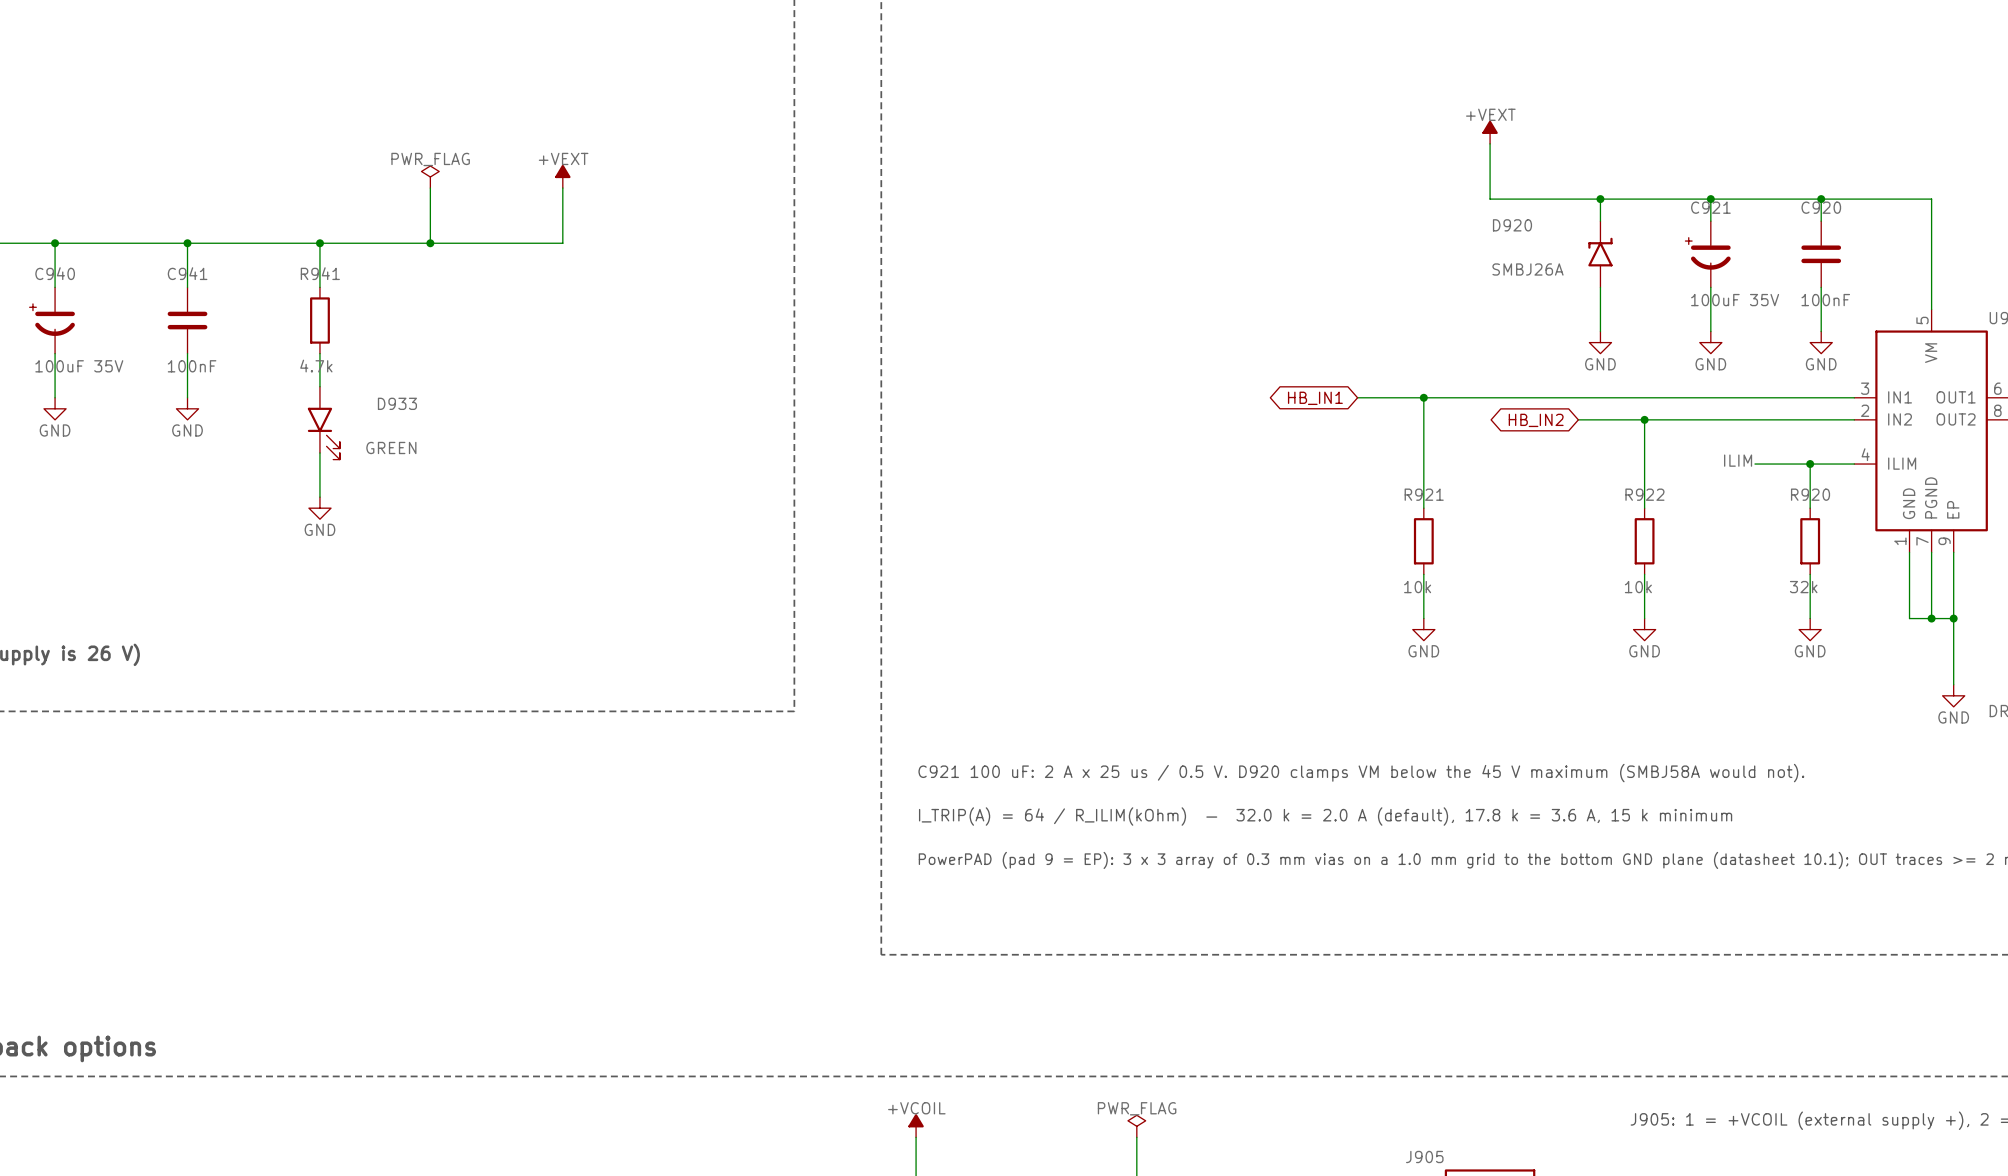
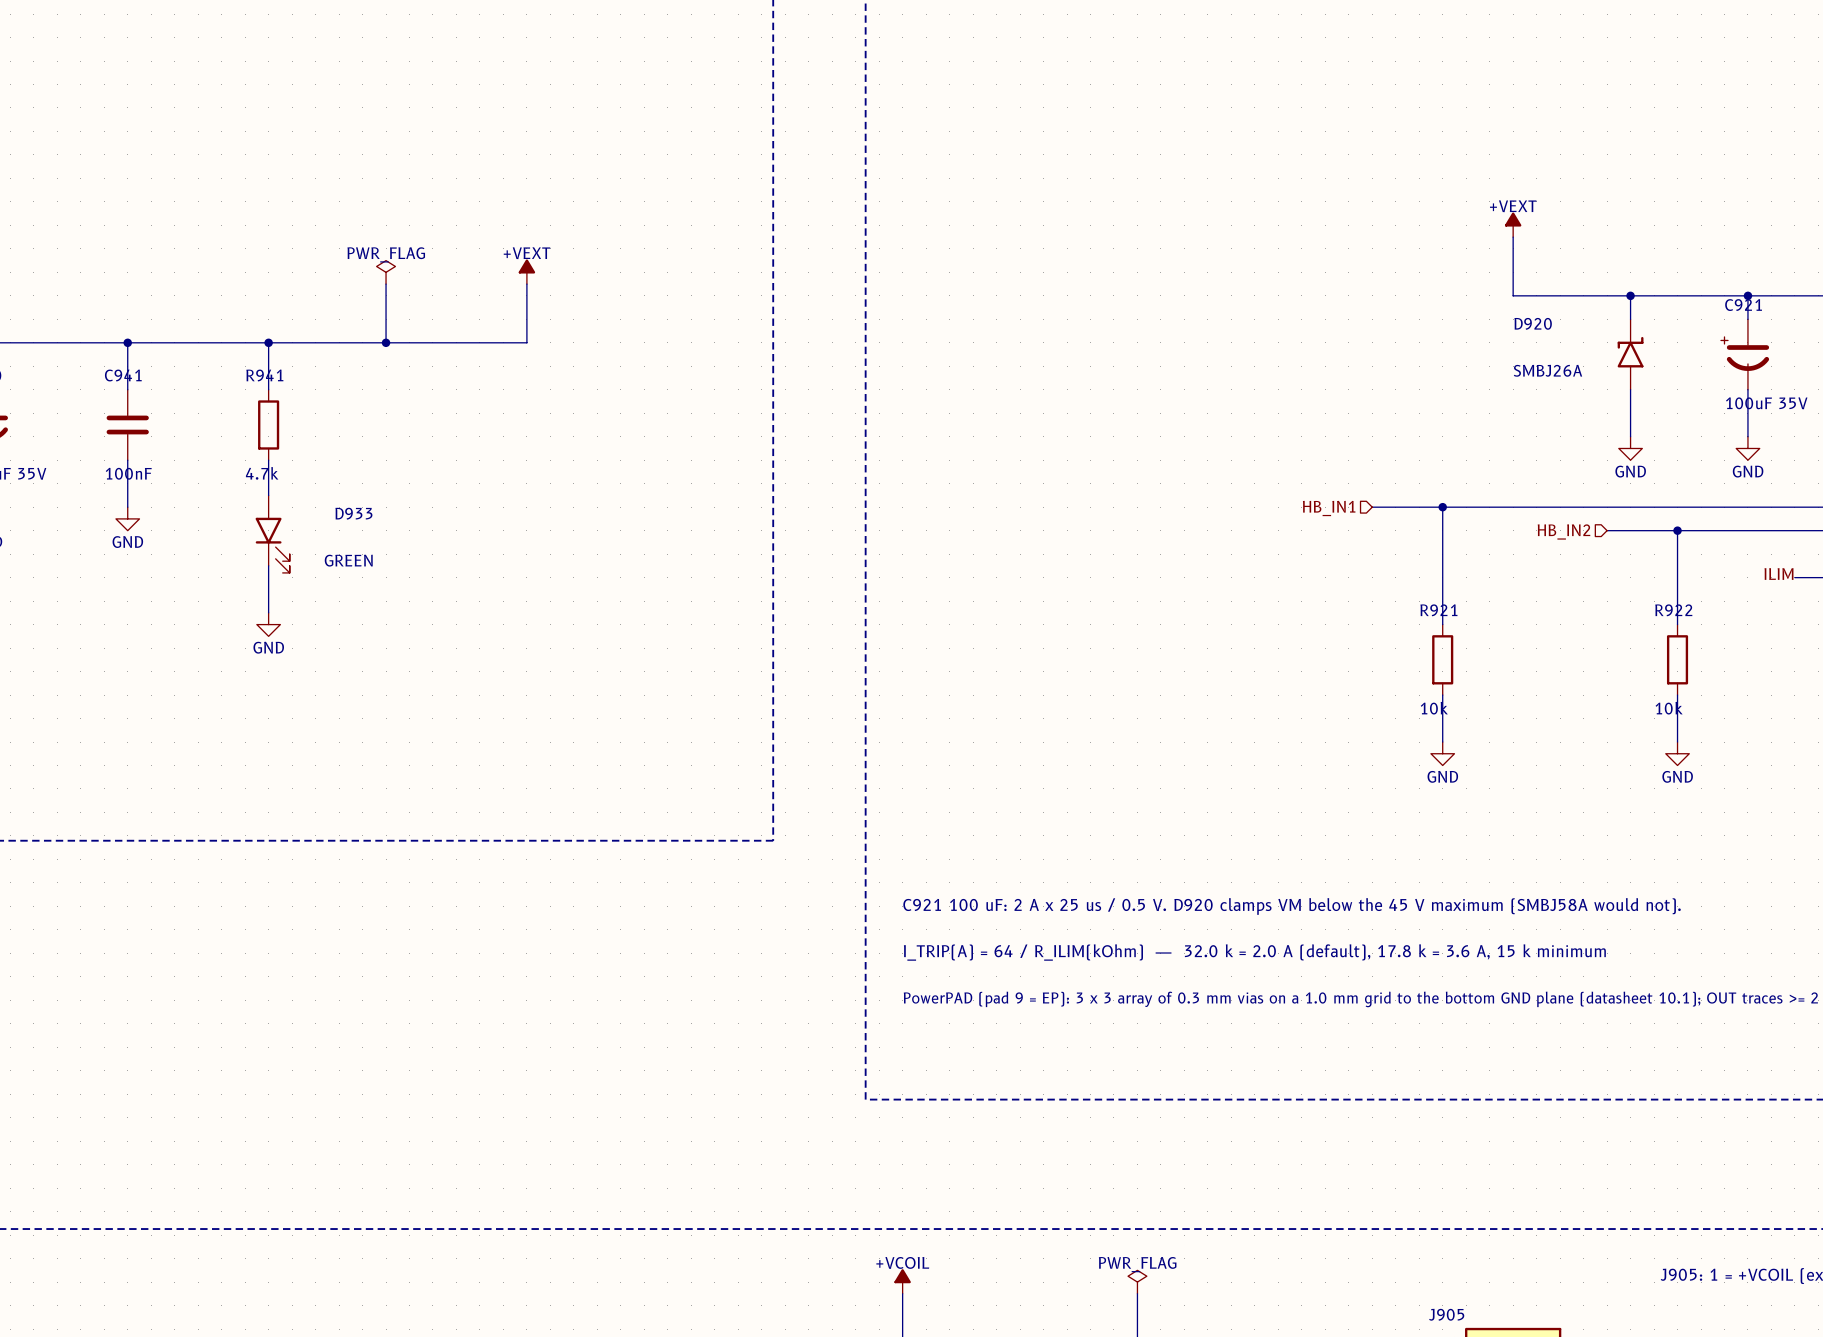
hierarchical label: none -> HB_IN1 (1329, 508)
global label: HB_IN1 (1315, 398) -> none
hierarchical label: none -> HB_IN2 (1564, 531)
global label: HB_IN2 (1536, 420) -> none

